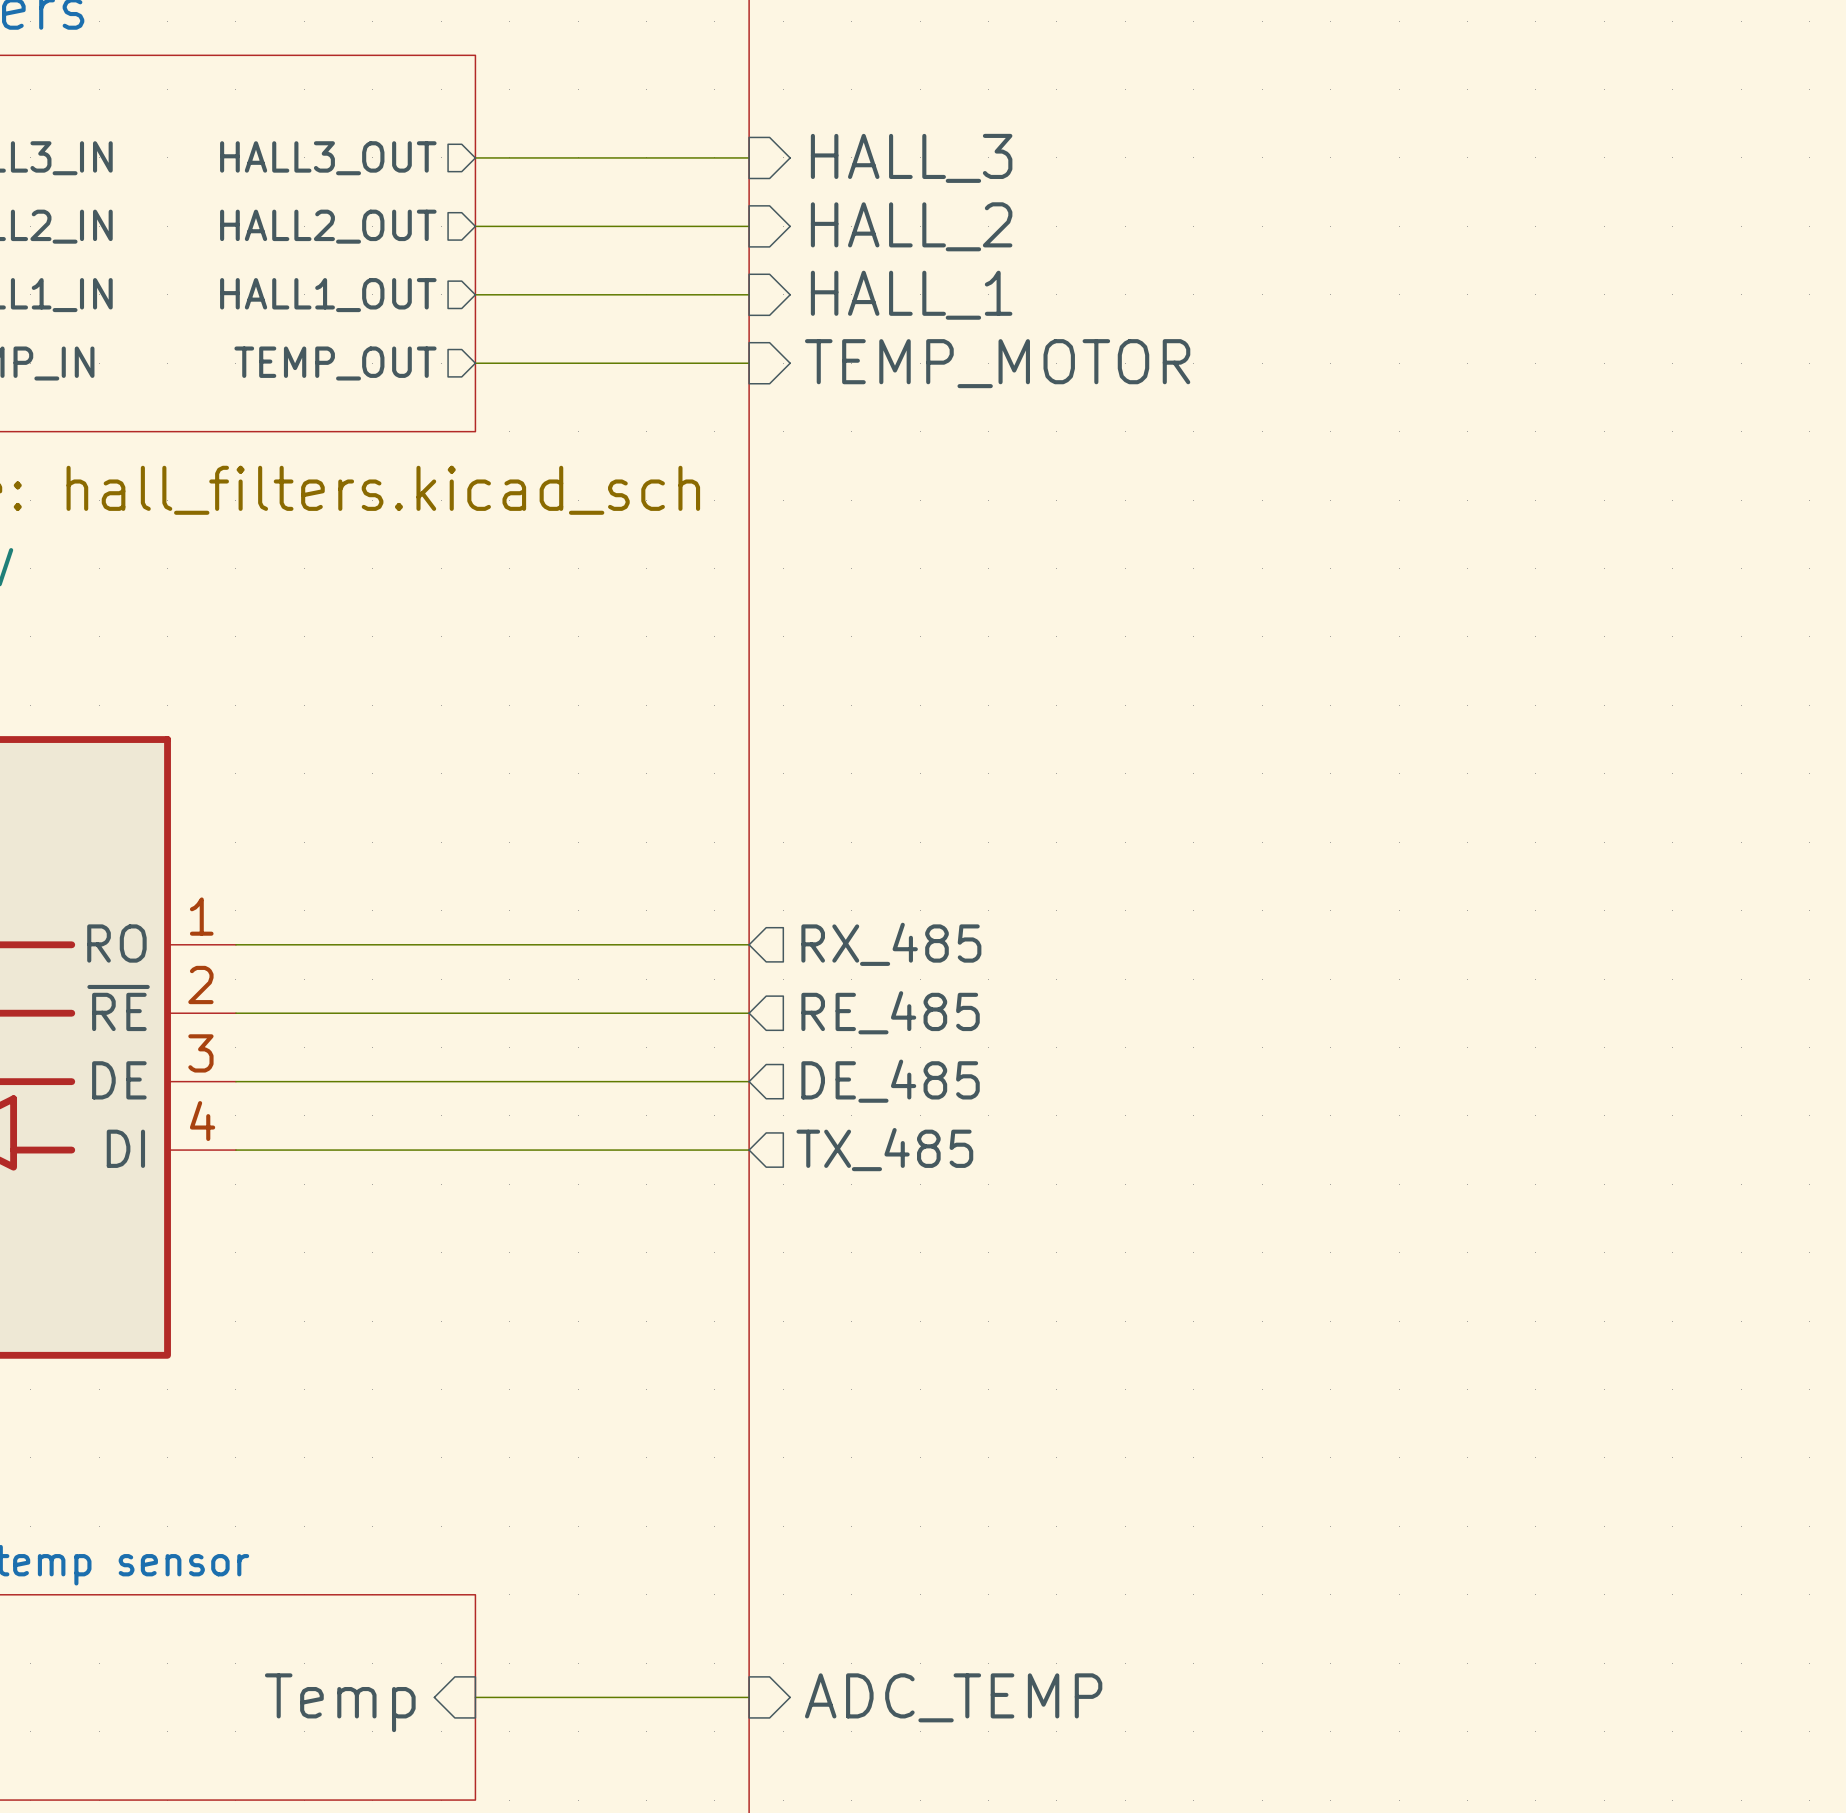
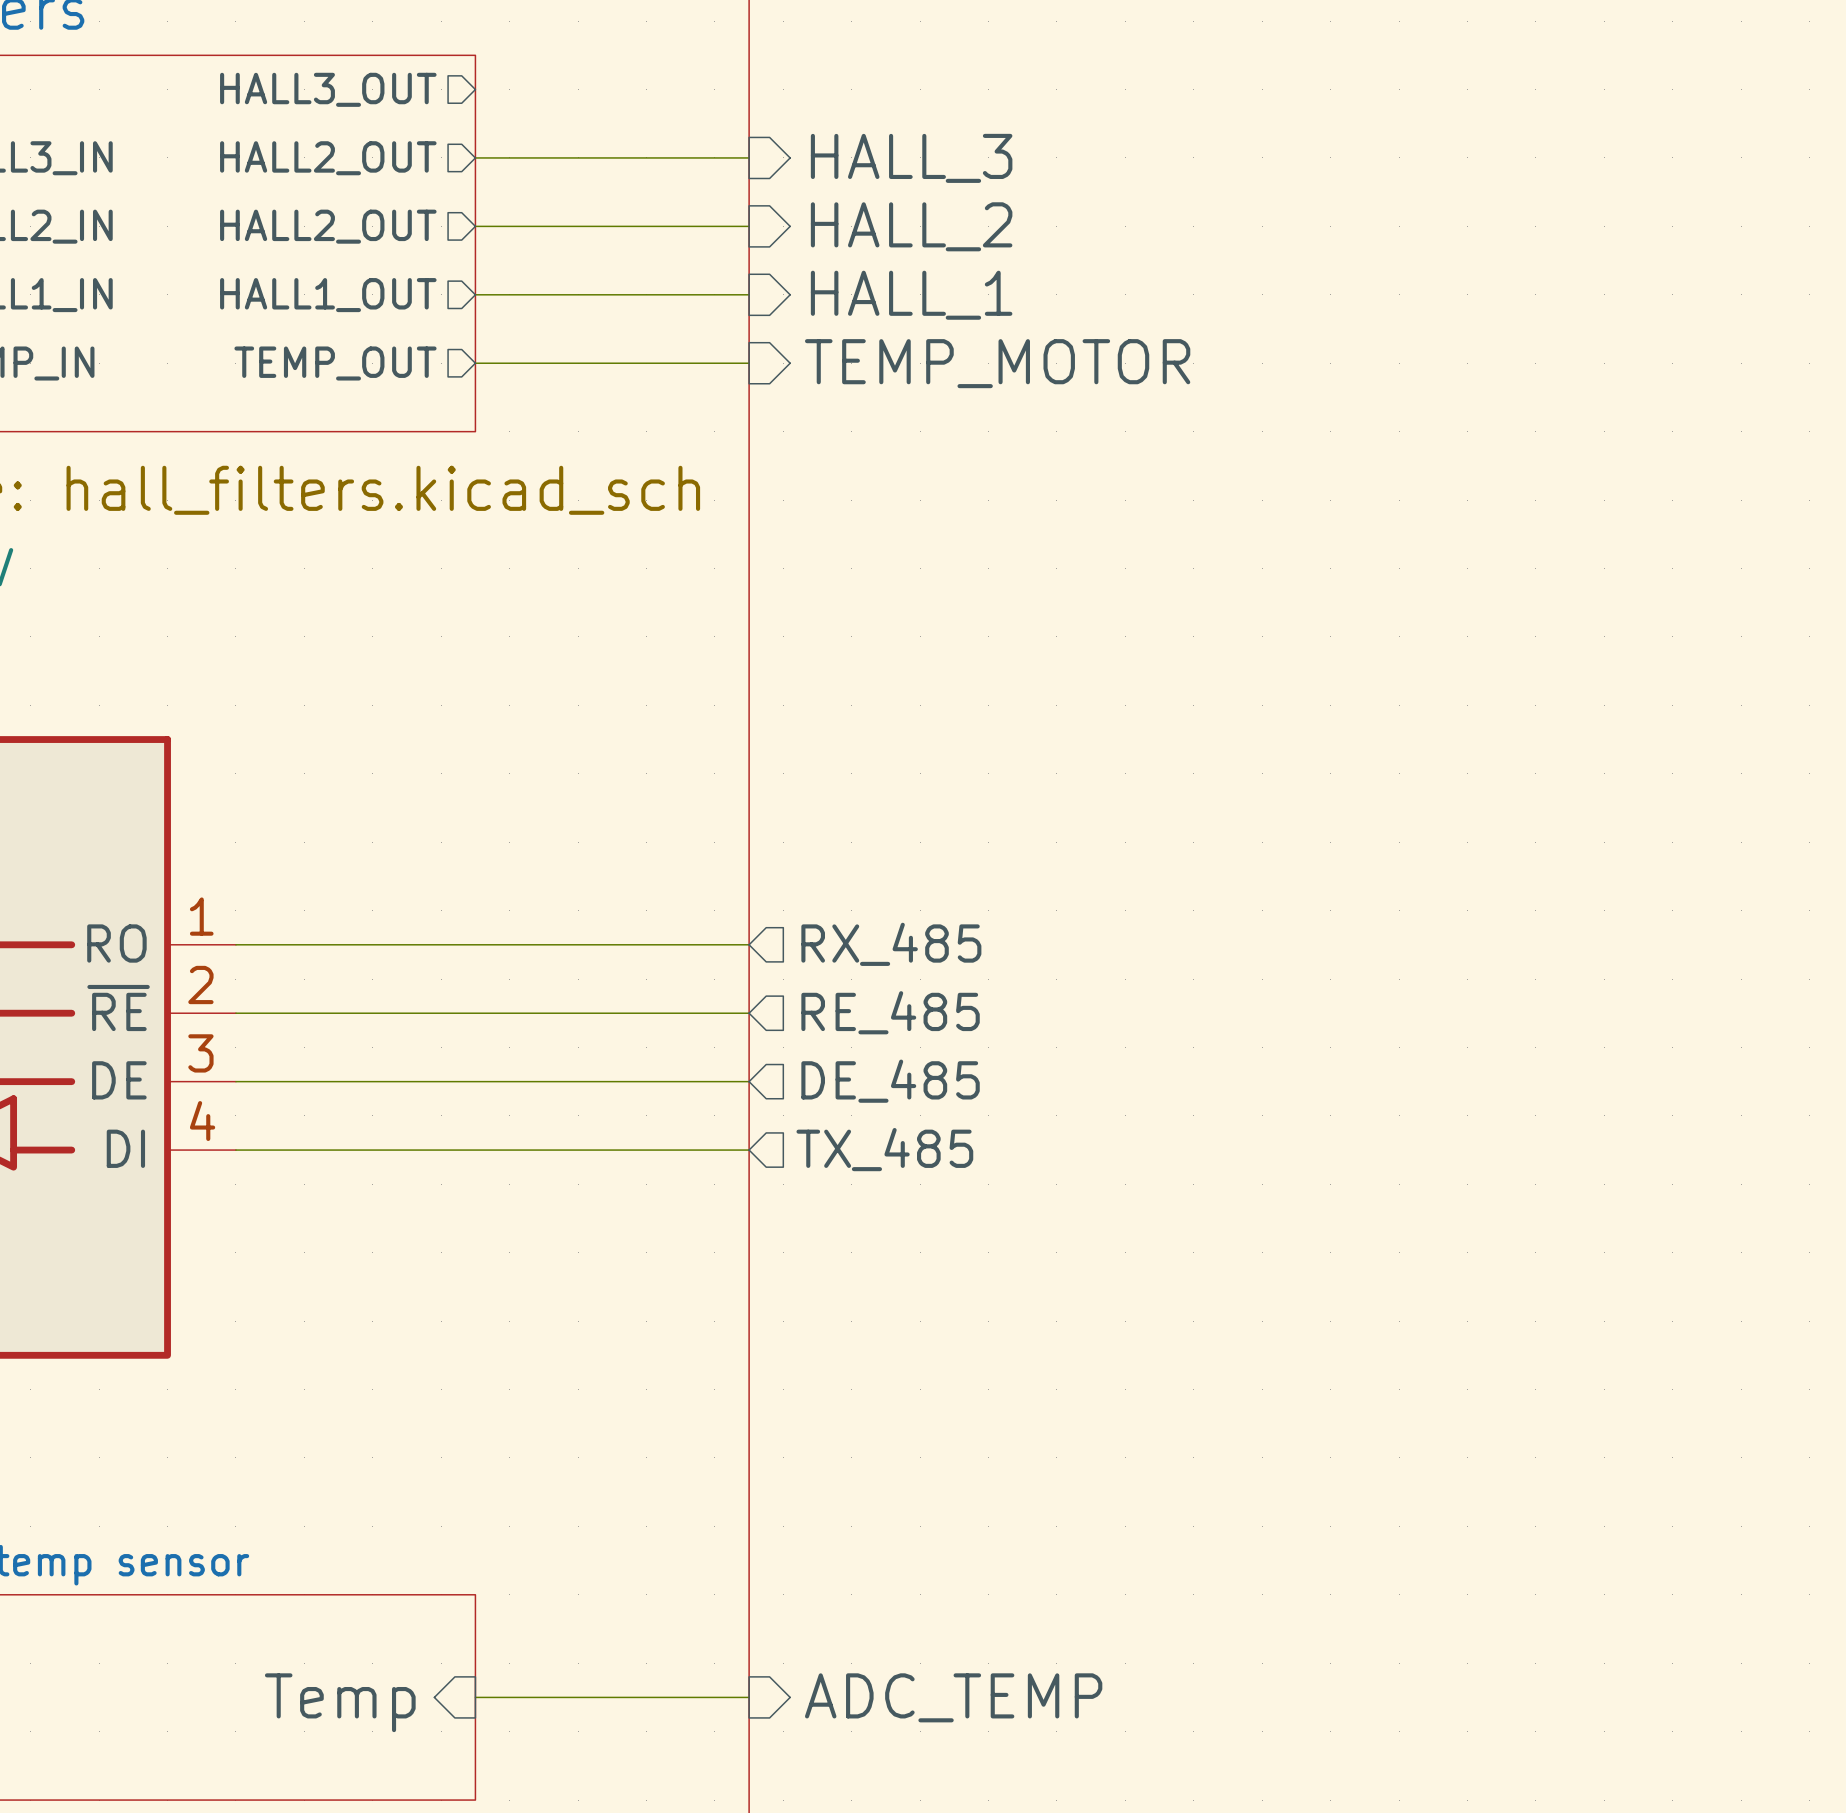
sheet pin: none -> HALL3_OUT (328, 89)
sheet pin: HALL3_OUT (328, 158) -> HALL2_OUT (328, 158)

